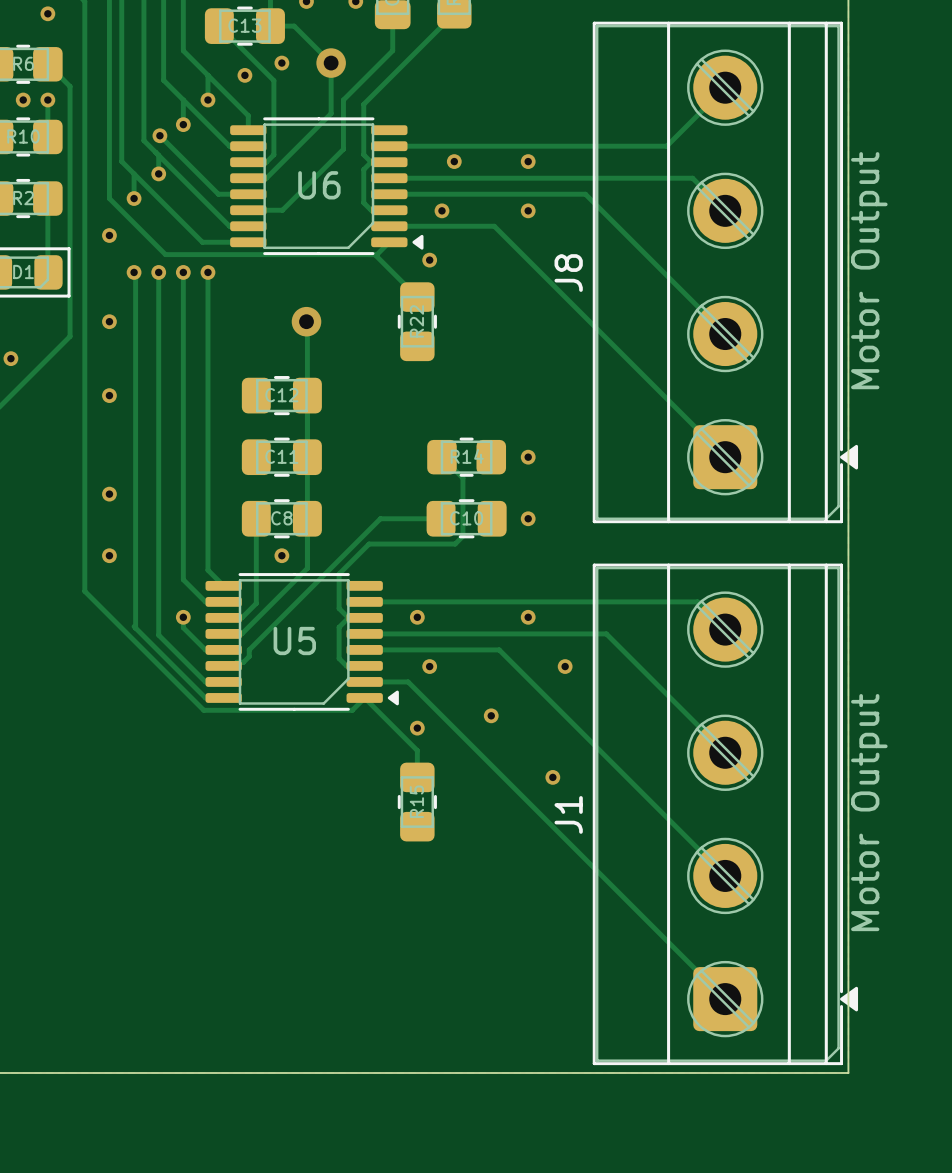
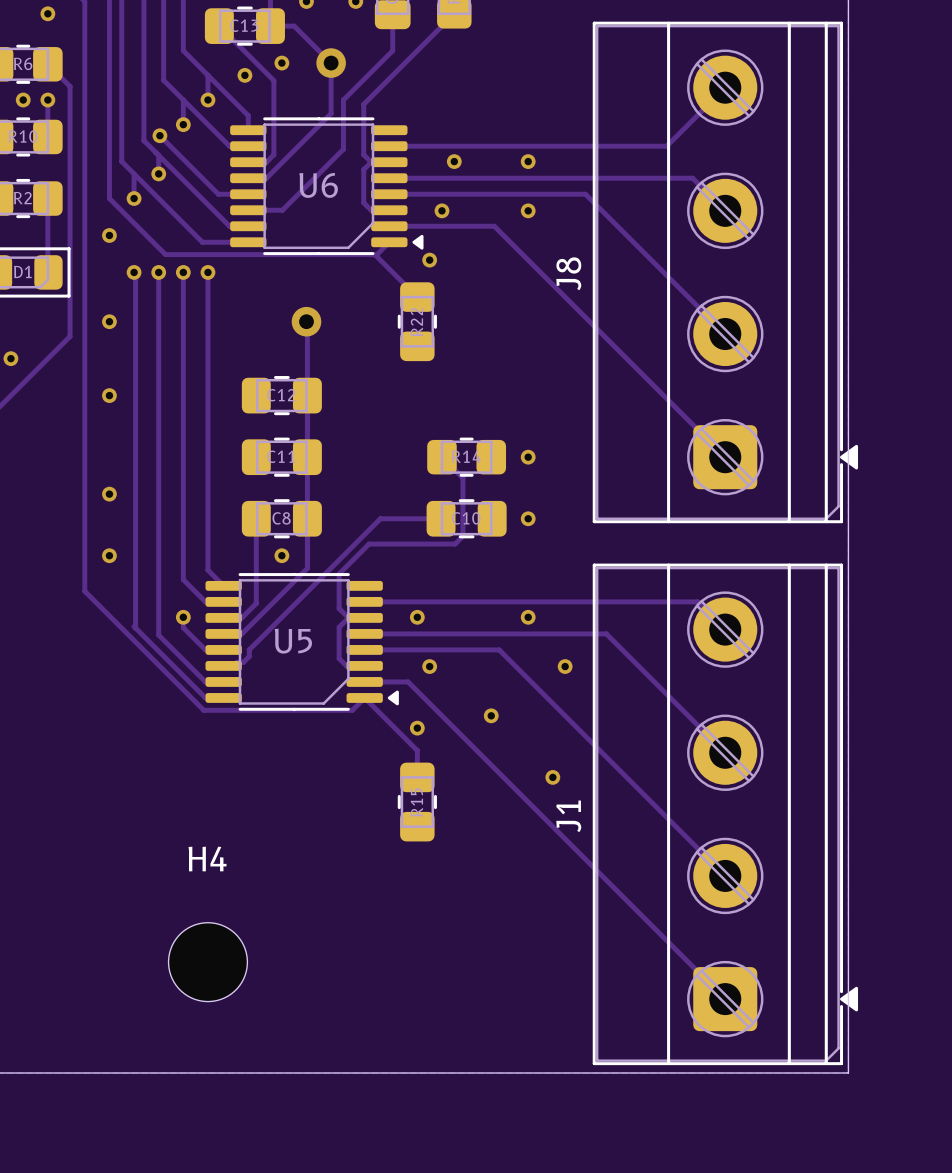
J8 value: Motor Output (869, 270) -> none
J1 value: Motor Output (869, 812) -> none
H4: none -> (207, 962)

